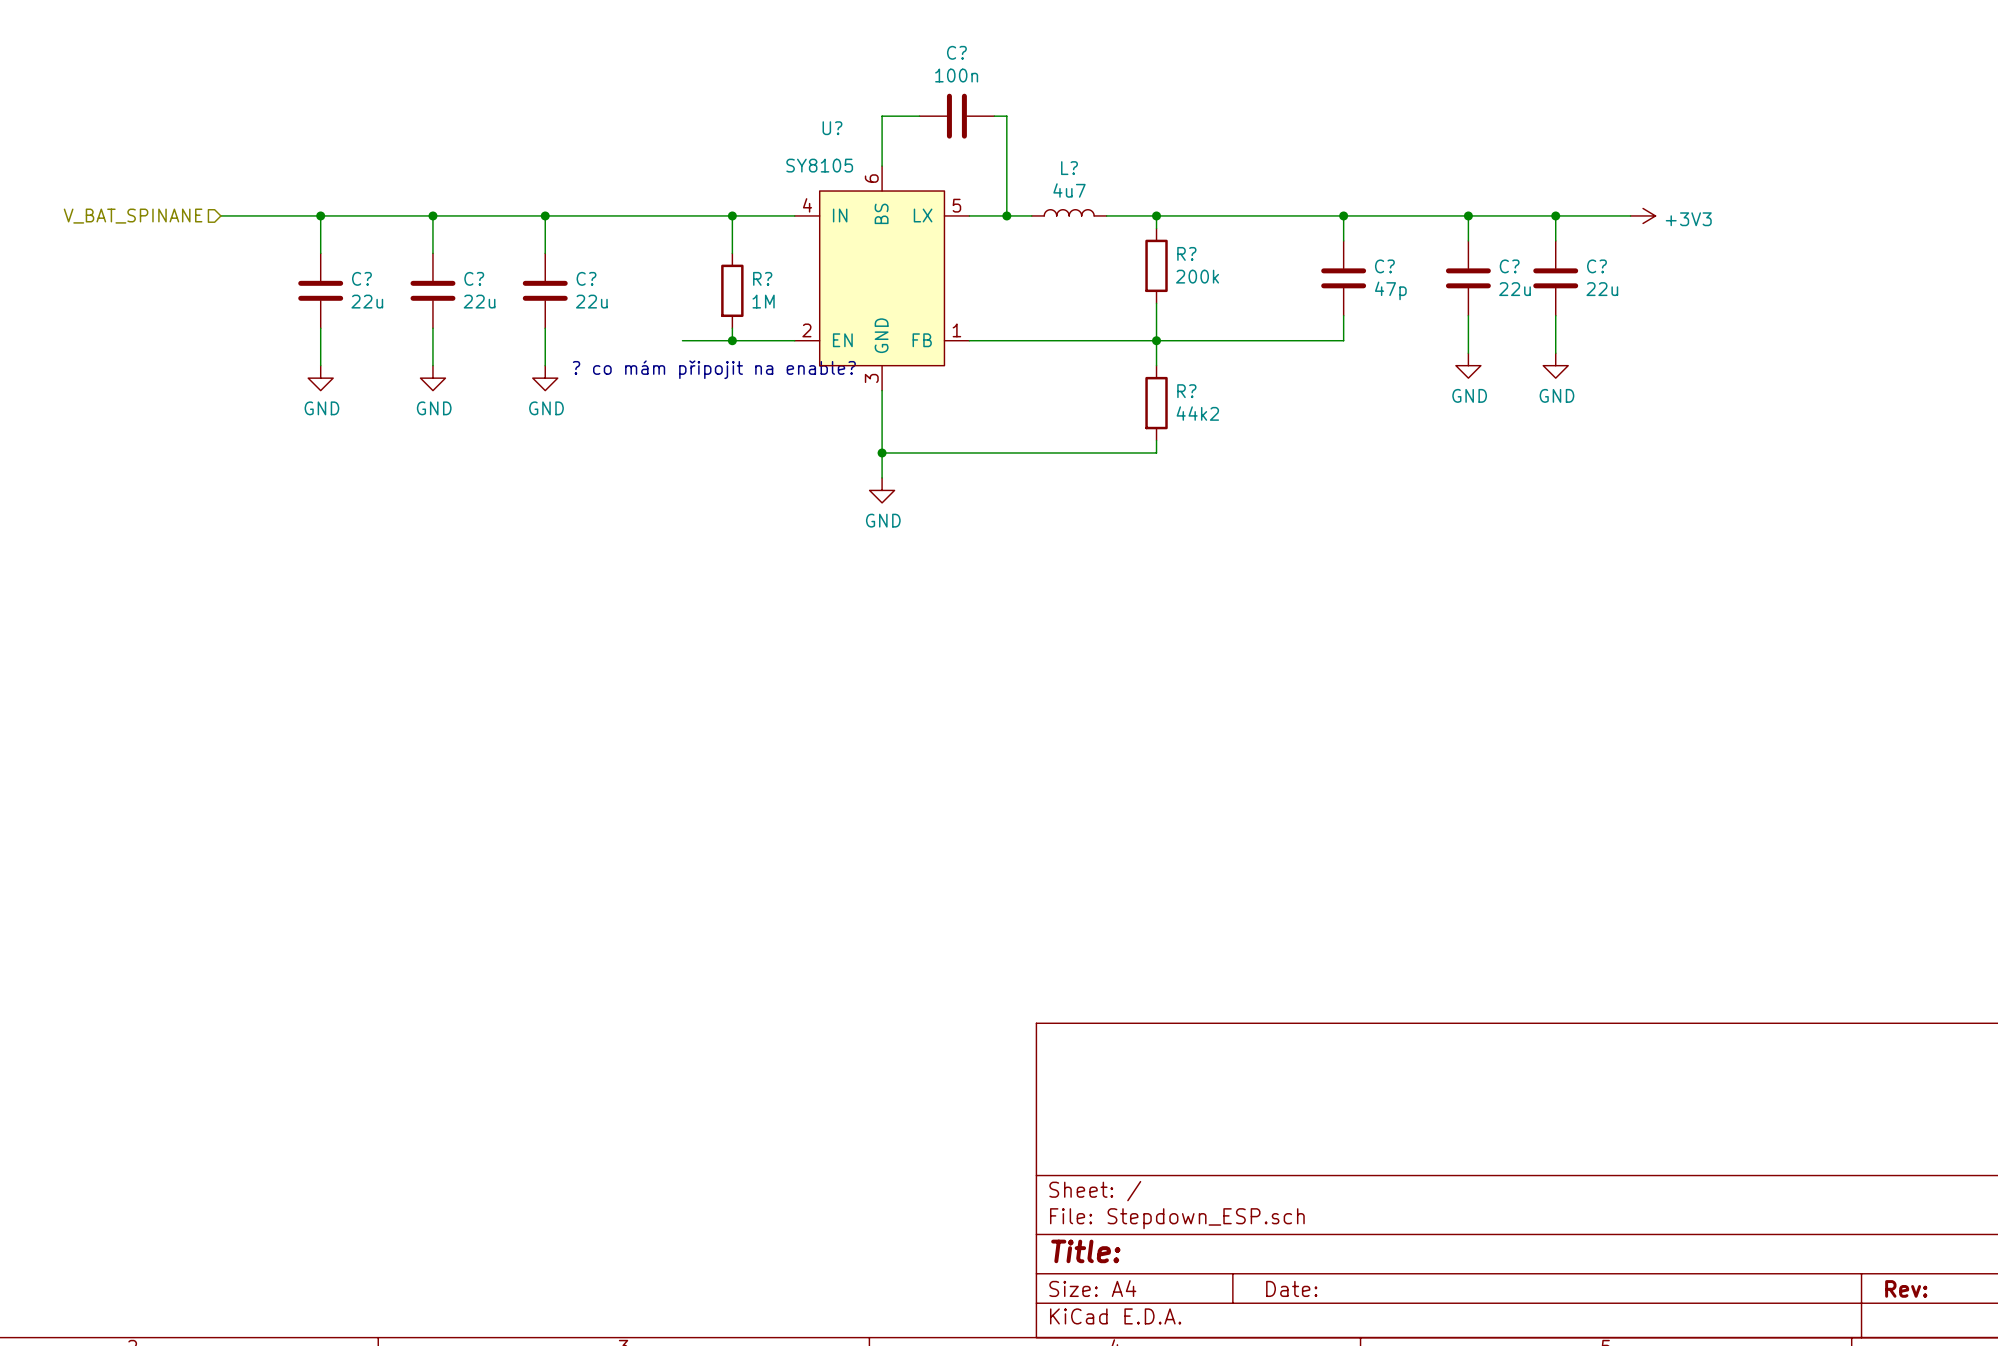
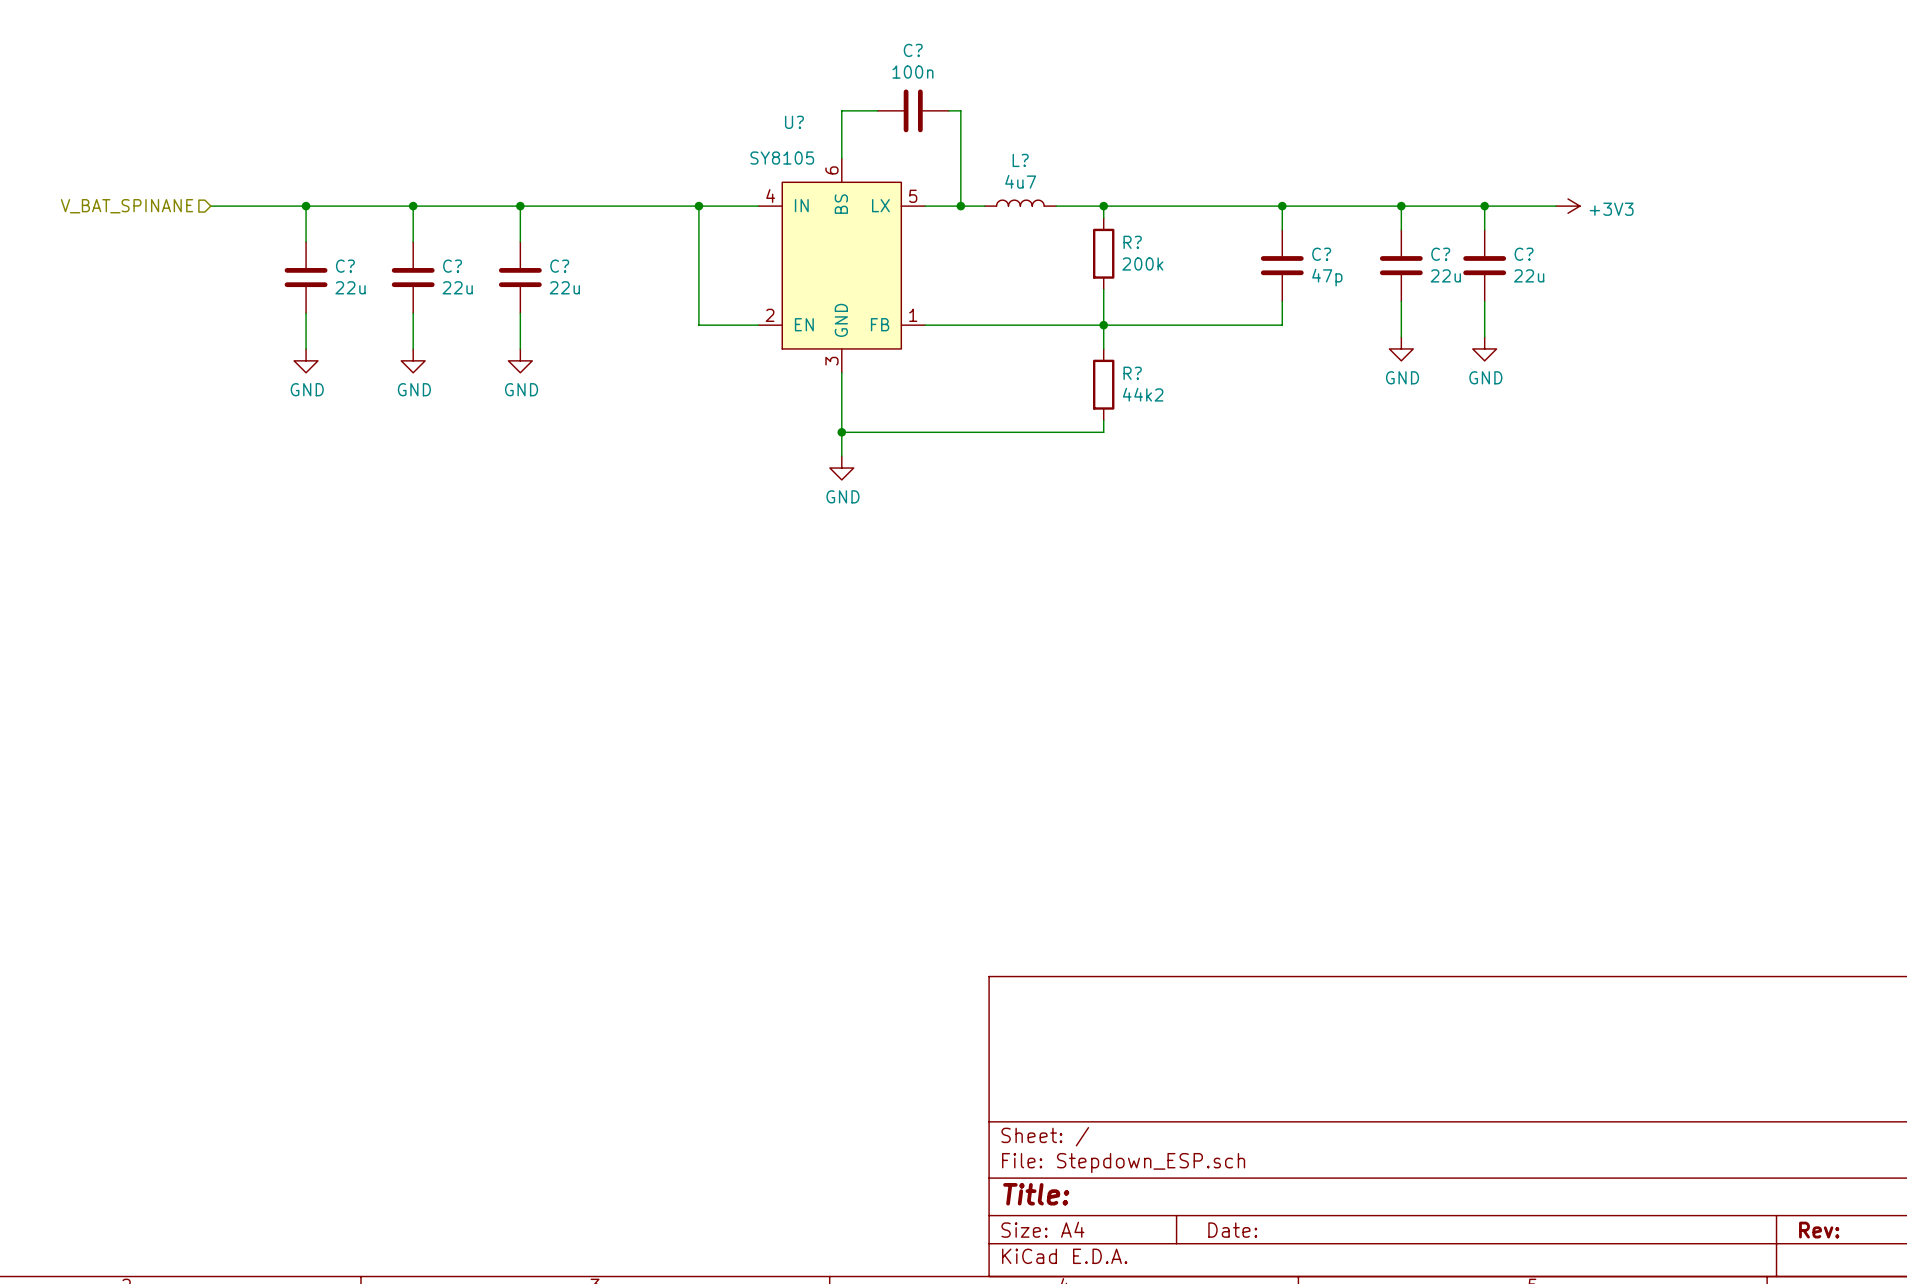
wire: none -> (698, 241) (698, 313)
R?: 1M (732, 290) -> none
wire: (682, 340) (732, 340) -> none
junction: (732, 340) -> none
text: ? co mám připojit na enable? (714, 369) -> none

